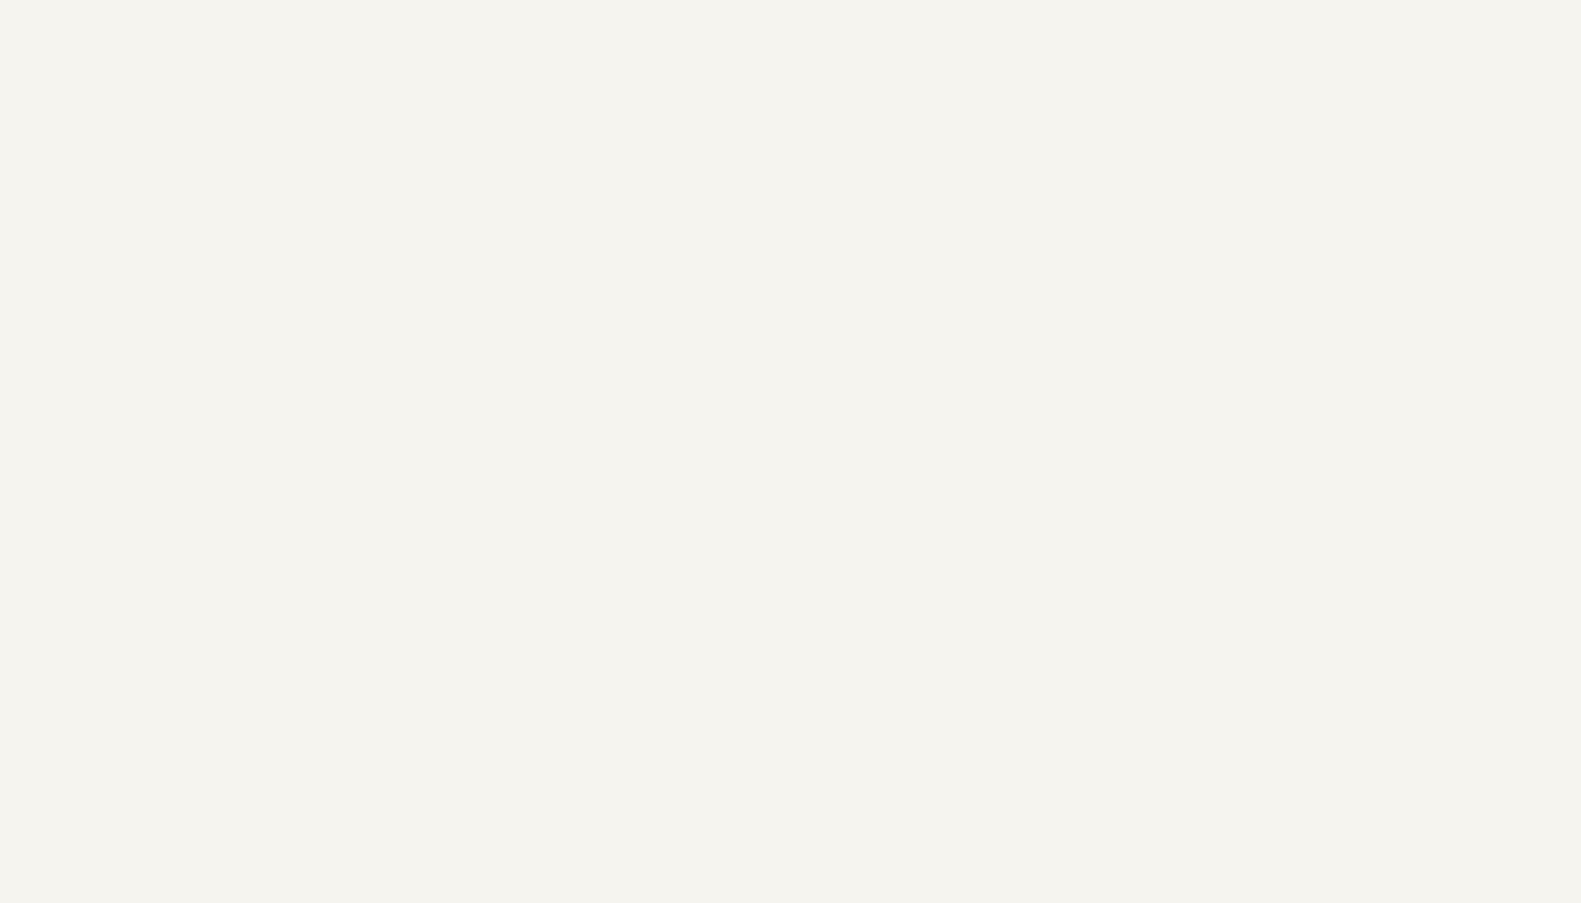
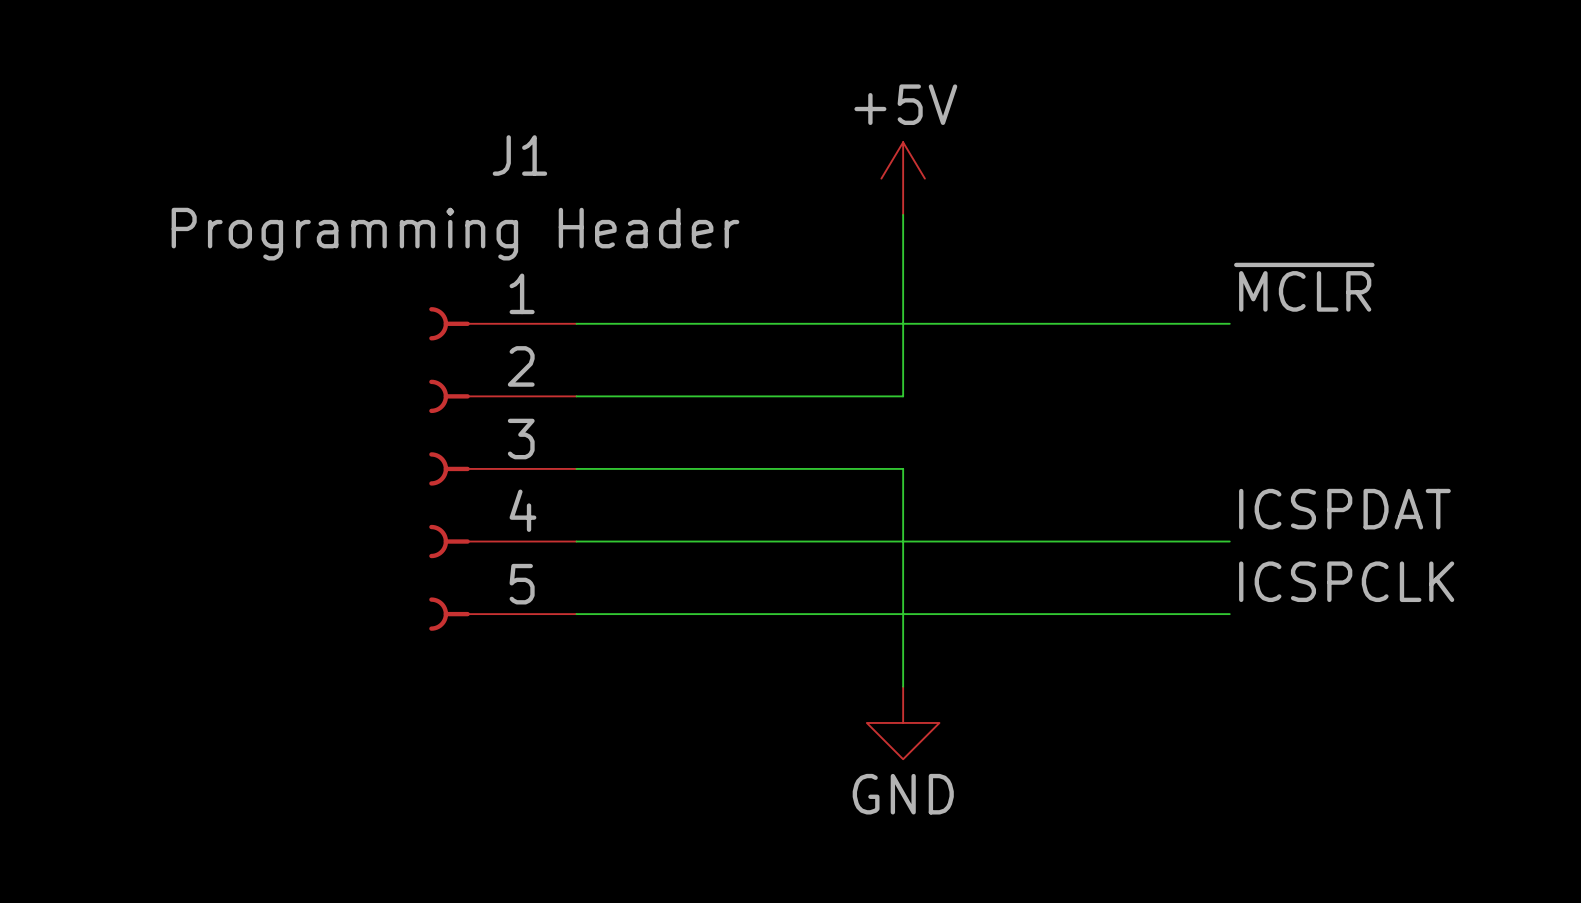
power symbol: none -> +5V (903, 178)
wire: none -> (903, 214) (903, 396) (576, 396)
label: none -> ~{MCLR} (1304, 287)
wire: none -> (576, 323) (1229, 323)
J1: none -> Programming Header (502, 468)
wire: none -> (576, 468) (903, 468) (903, 686)
label: none -> ICSPDAT (1344, 509)
wire: none -> (576, 541) (1229, 541)
label: none -> ICSPCLK (1346, 581)
wire: none -> (576, 614) (1229, 614)
power symbol: none -> GND (903, 722)

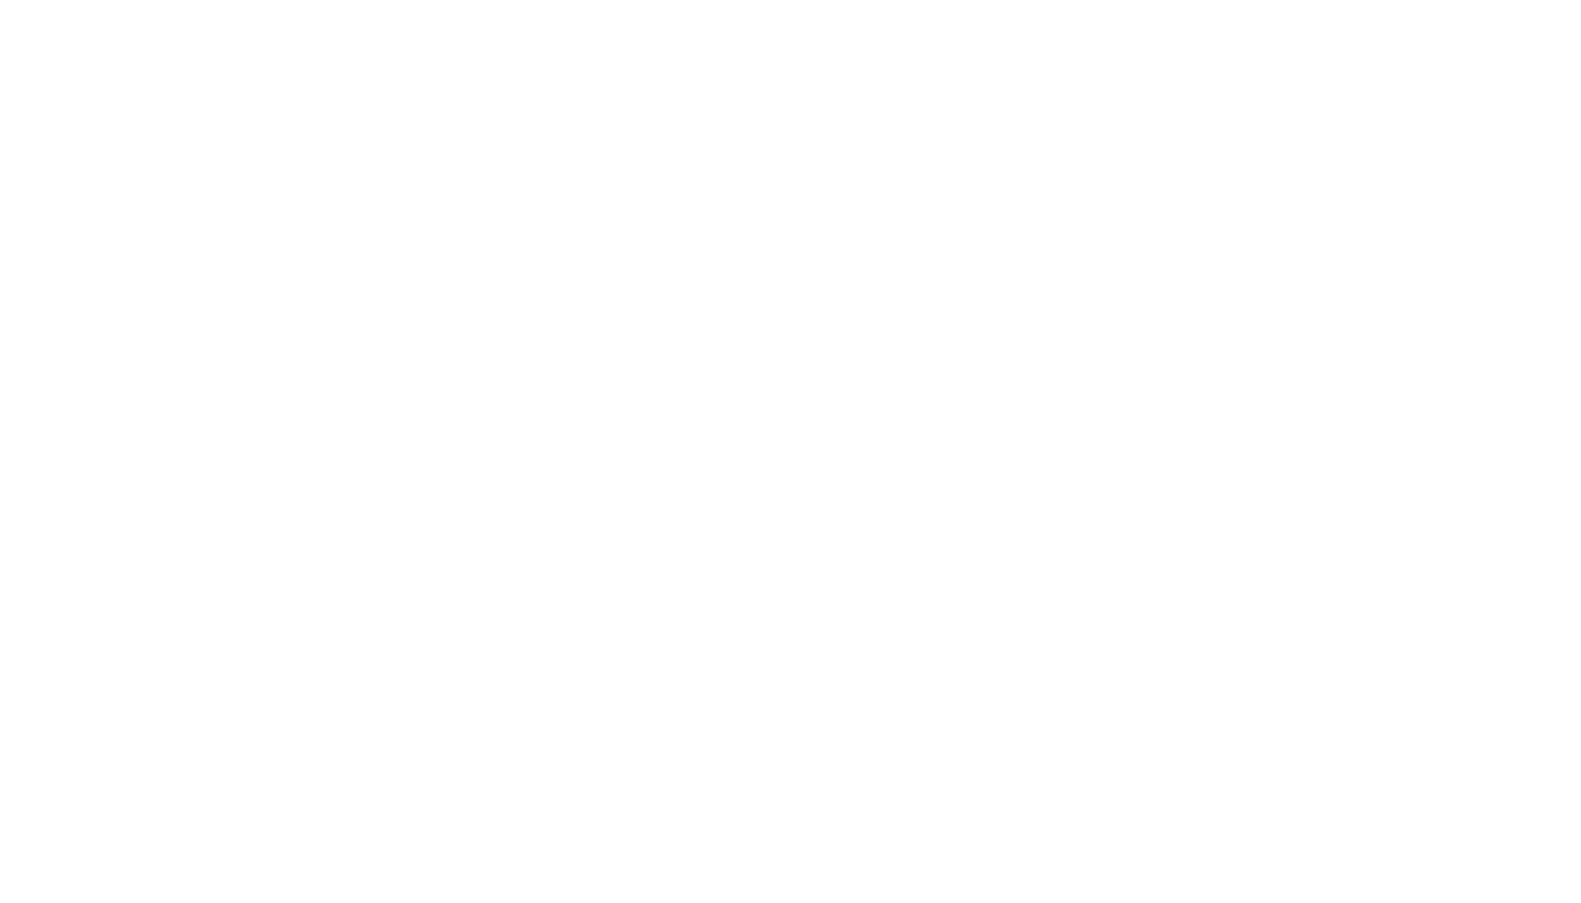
power symbol: +5V (903, 178) -> none
wire: (903, 214) (903, 396) (576, 396) -> none
label: ~{MCLR} (1304, 287) -> none
wire: (576, 323) (1229, 323) -> none
J1: Programming Header (502, 468) -> none
wire: (576, 468) (903, 468) (903, 686) -> none
label: ICSPDAT (1344, 509) -> none
wire: (576, 541) (1229, 541) -> none
label: ICSPCLK (1346, 581) -> none
wire: (576, 614) (1229, 614) -> none
power symbol: GND (903, 722) -> none

